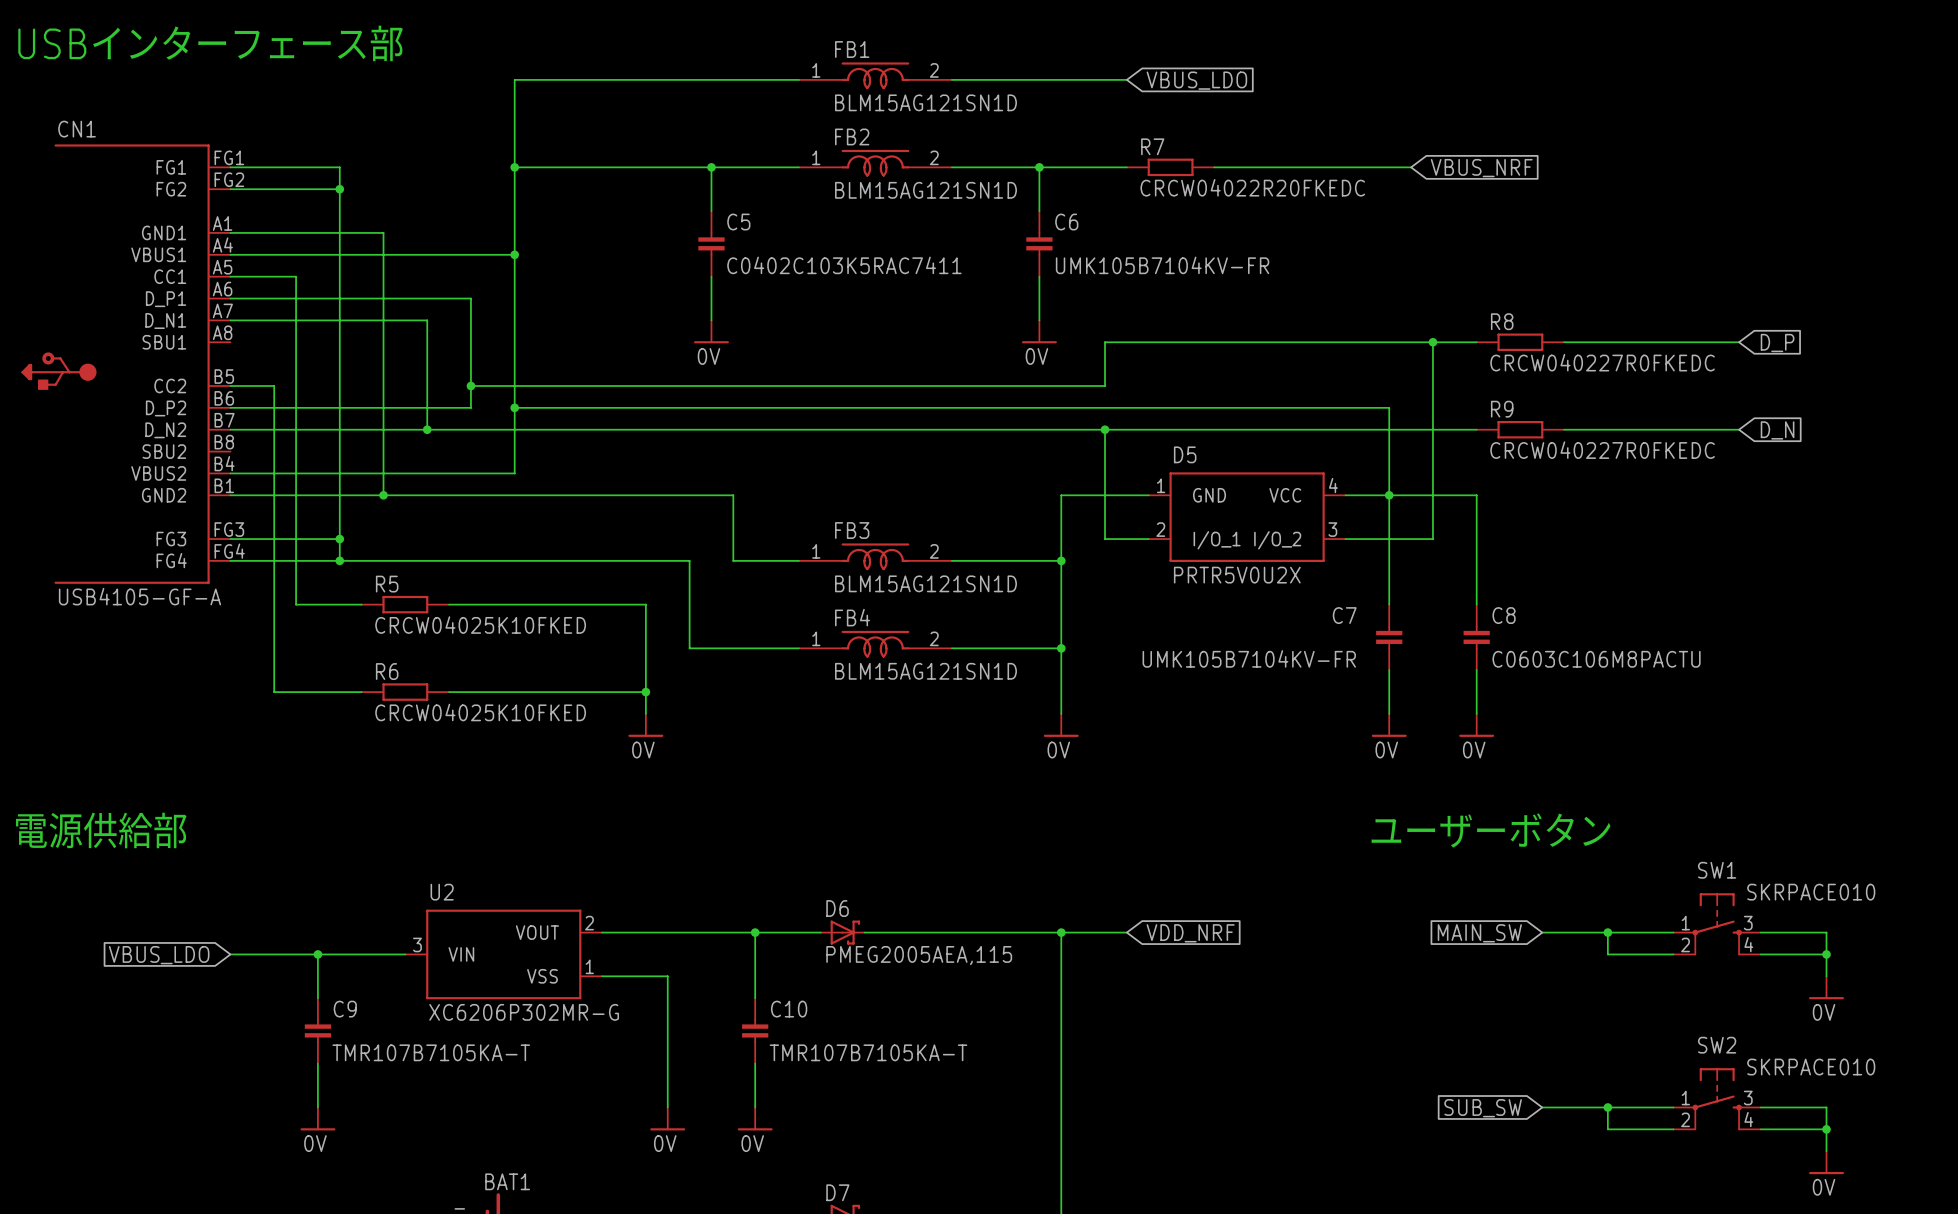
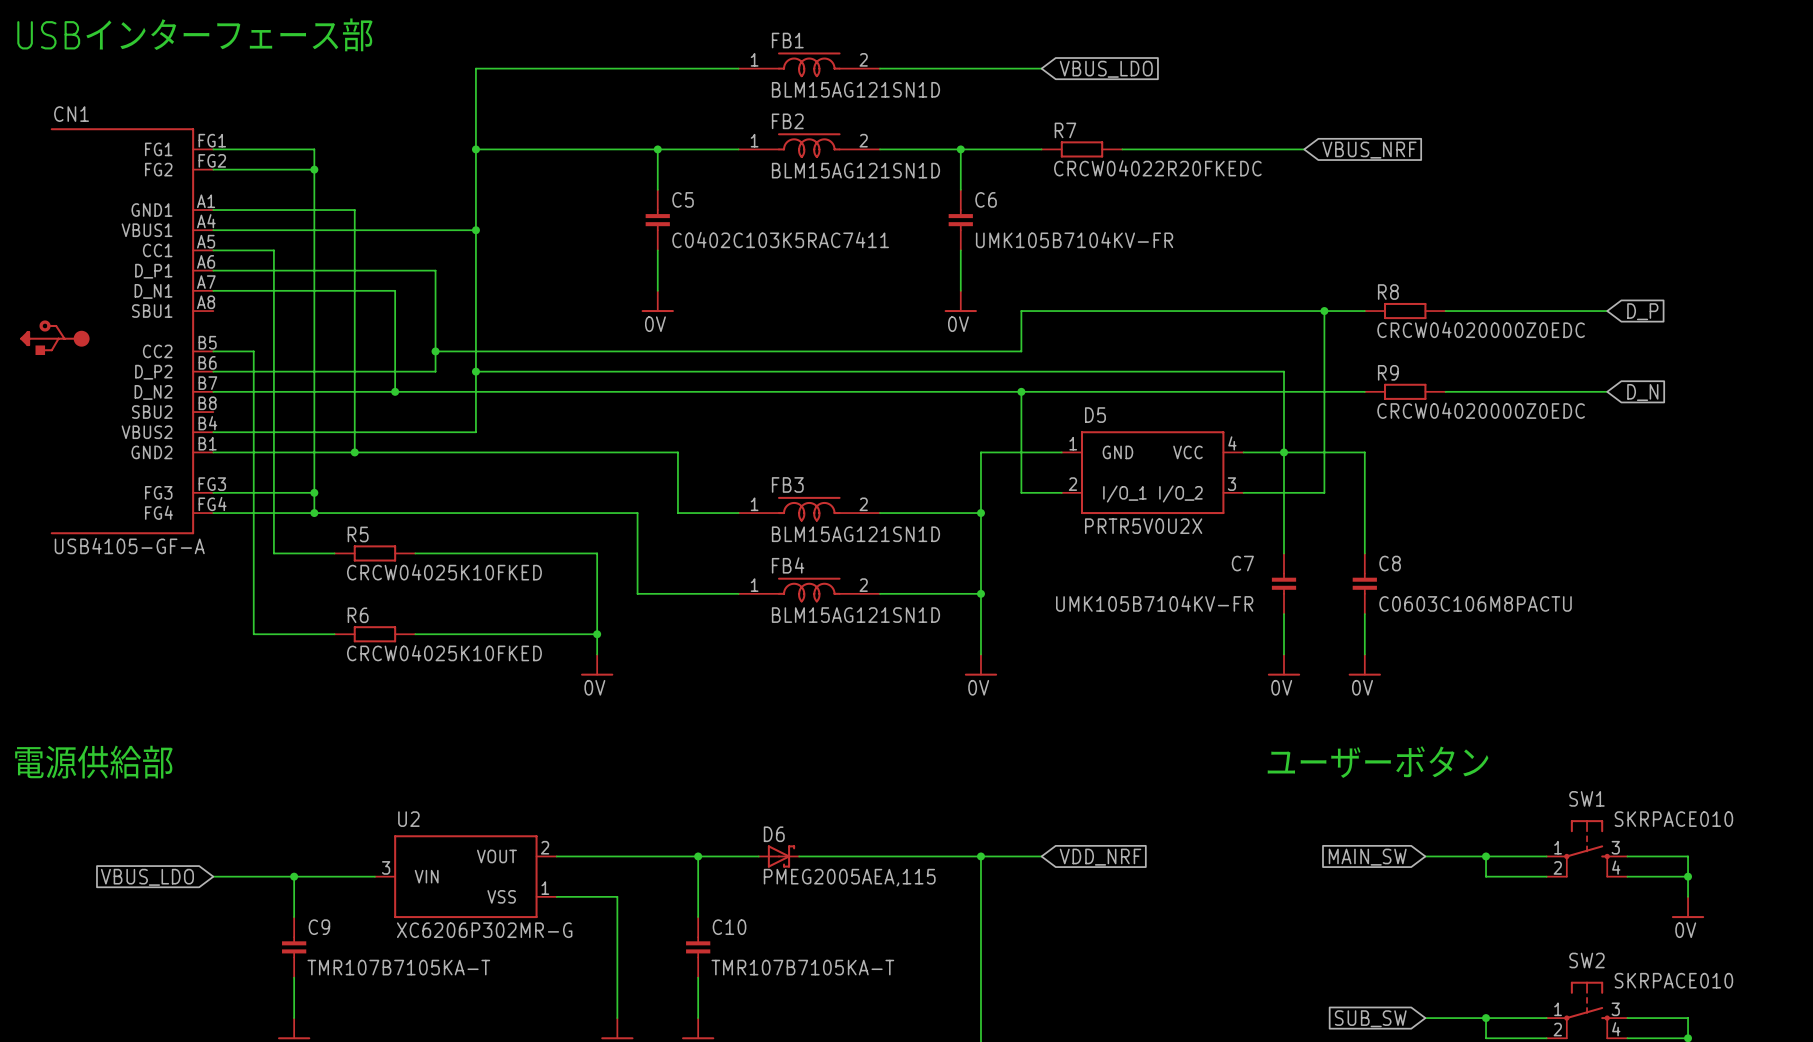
R8 value: CRCW040227R0FKEDC (1602, 362) -> CRCW04020000Z0EDC (1481, 329)
R9 value: CRCW040227R0FKEDC (1602, 450) -> CRCW04020000Z0EDC (1481, 410)

